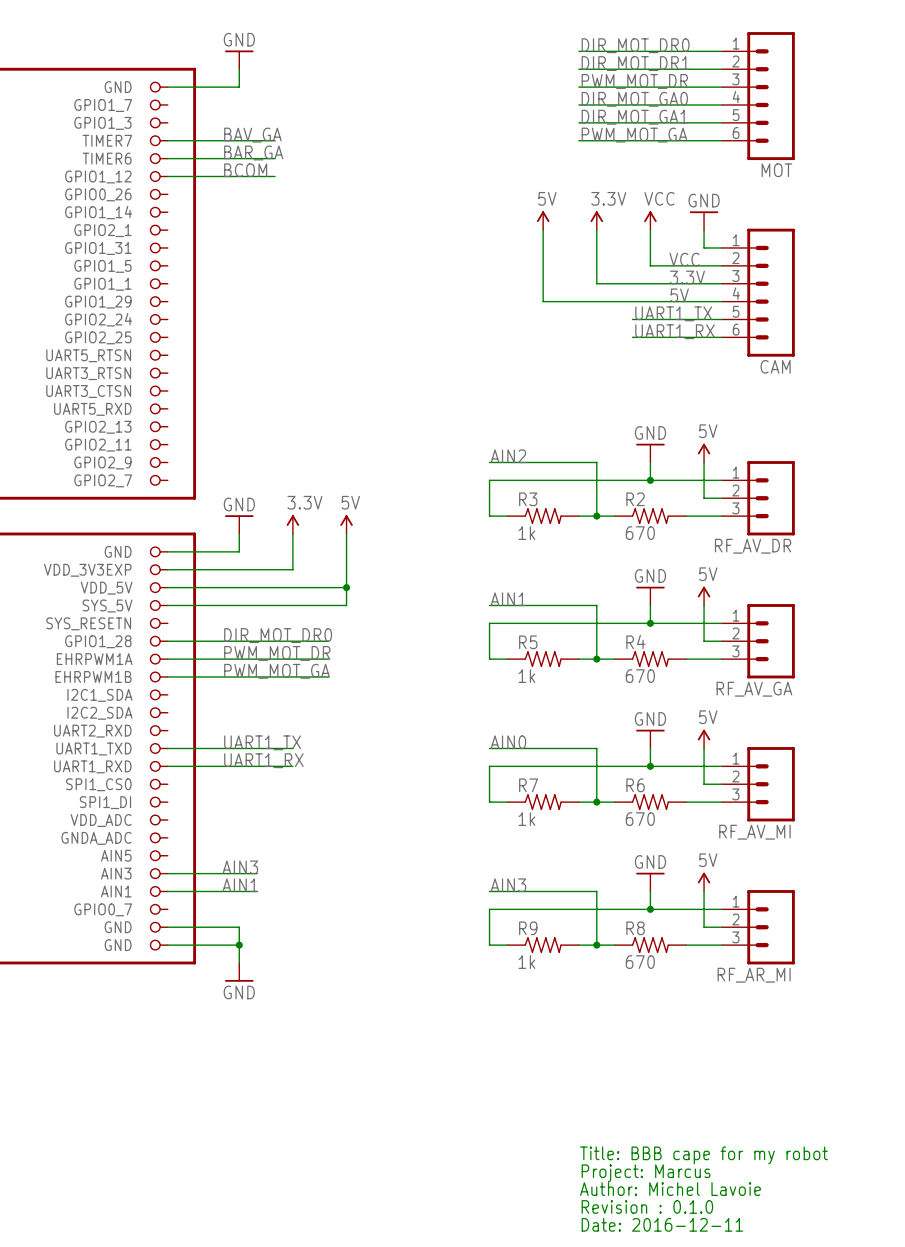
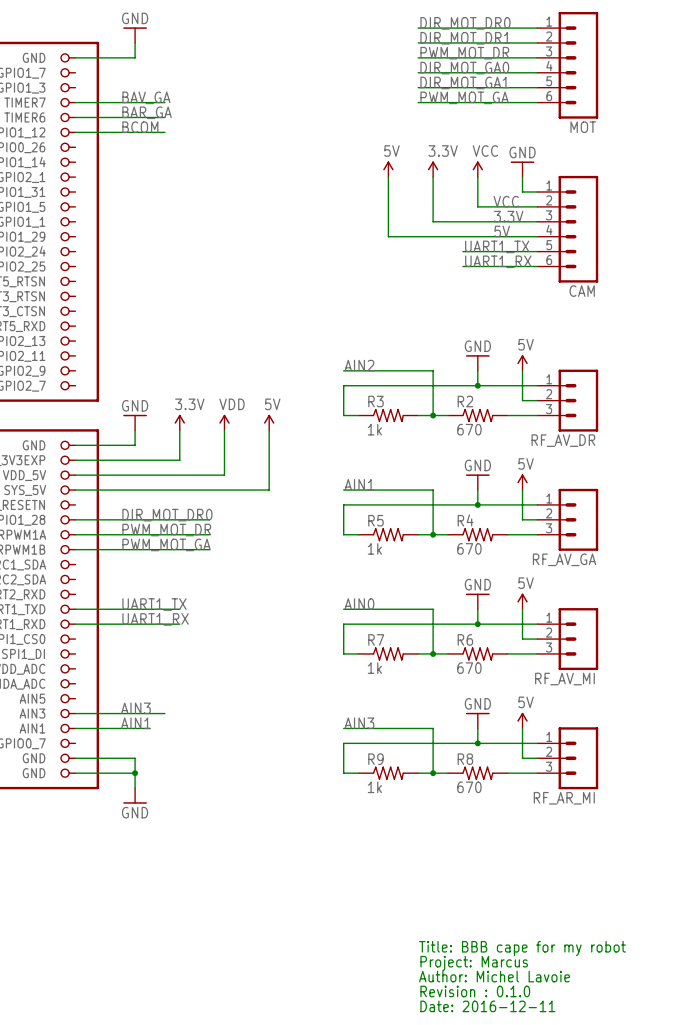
power symbol: 5V (346, 524) -> VDD (224, 422)
power symbol: none -> 5V (269, 422)
wire: (346, 587) (346, 605) -> (269, 430) (269, 490) (224, 490)
junction: (346, 587) -> none
wire: none -> (149, 713) (164, 713)

